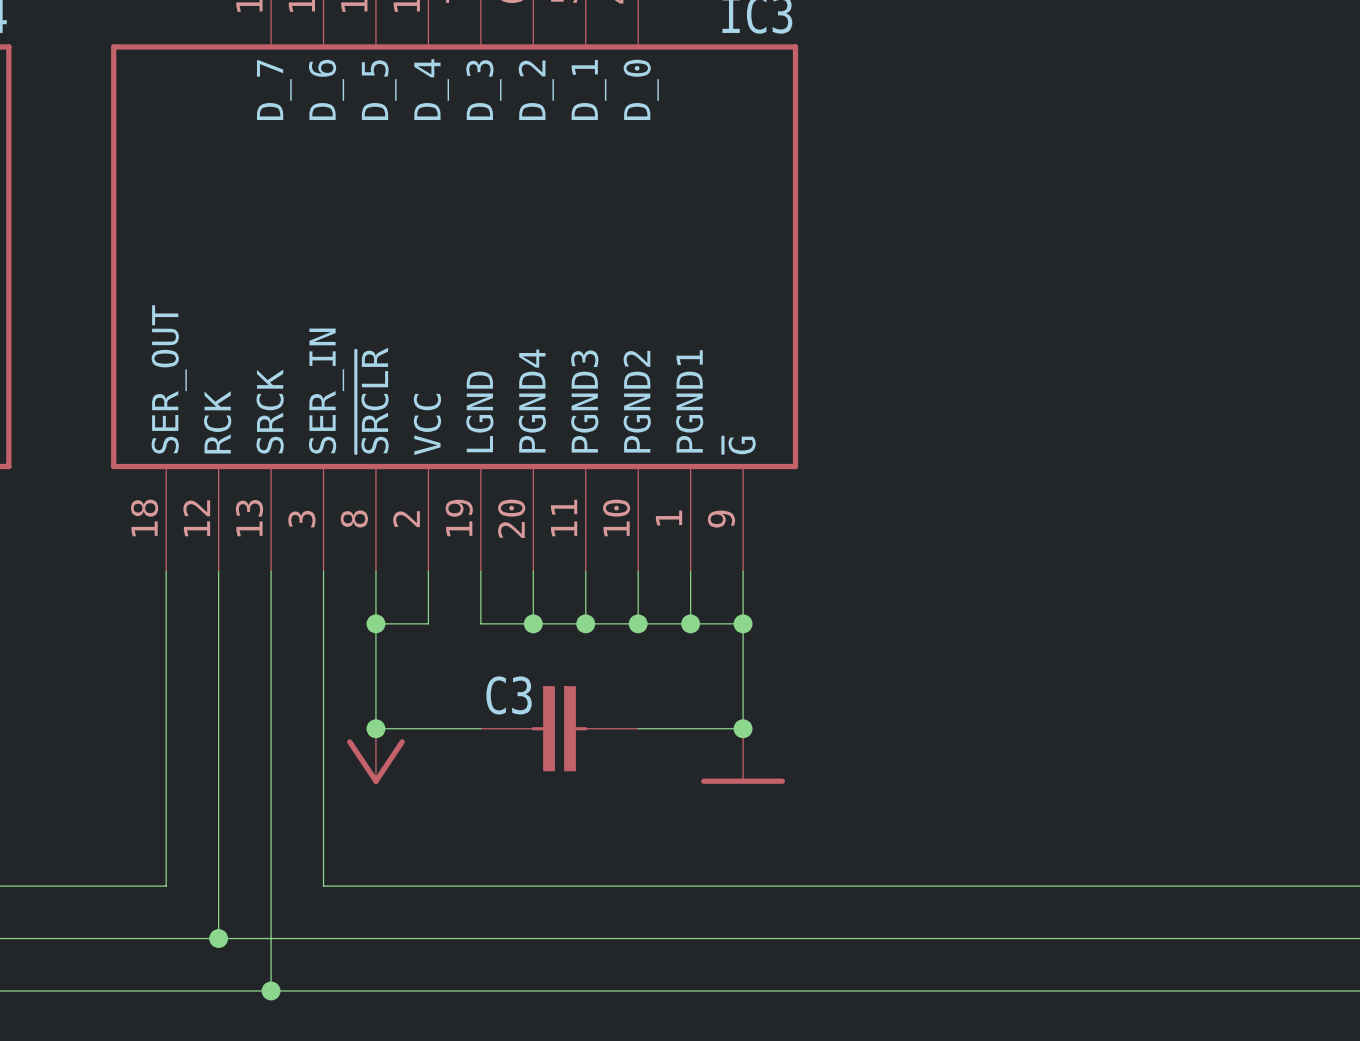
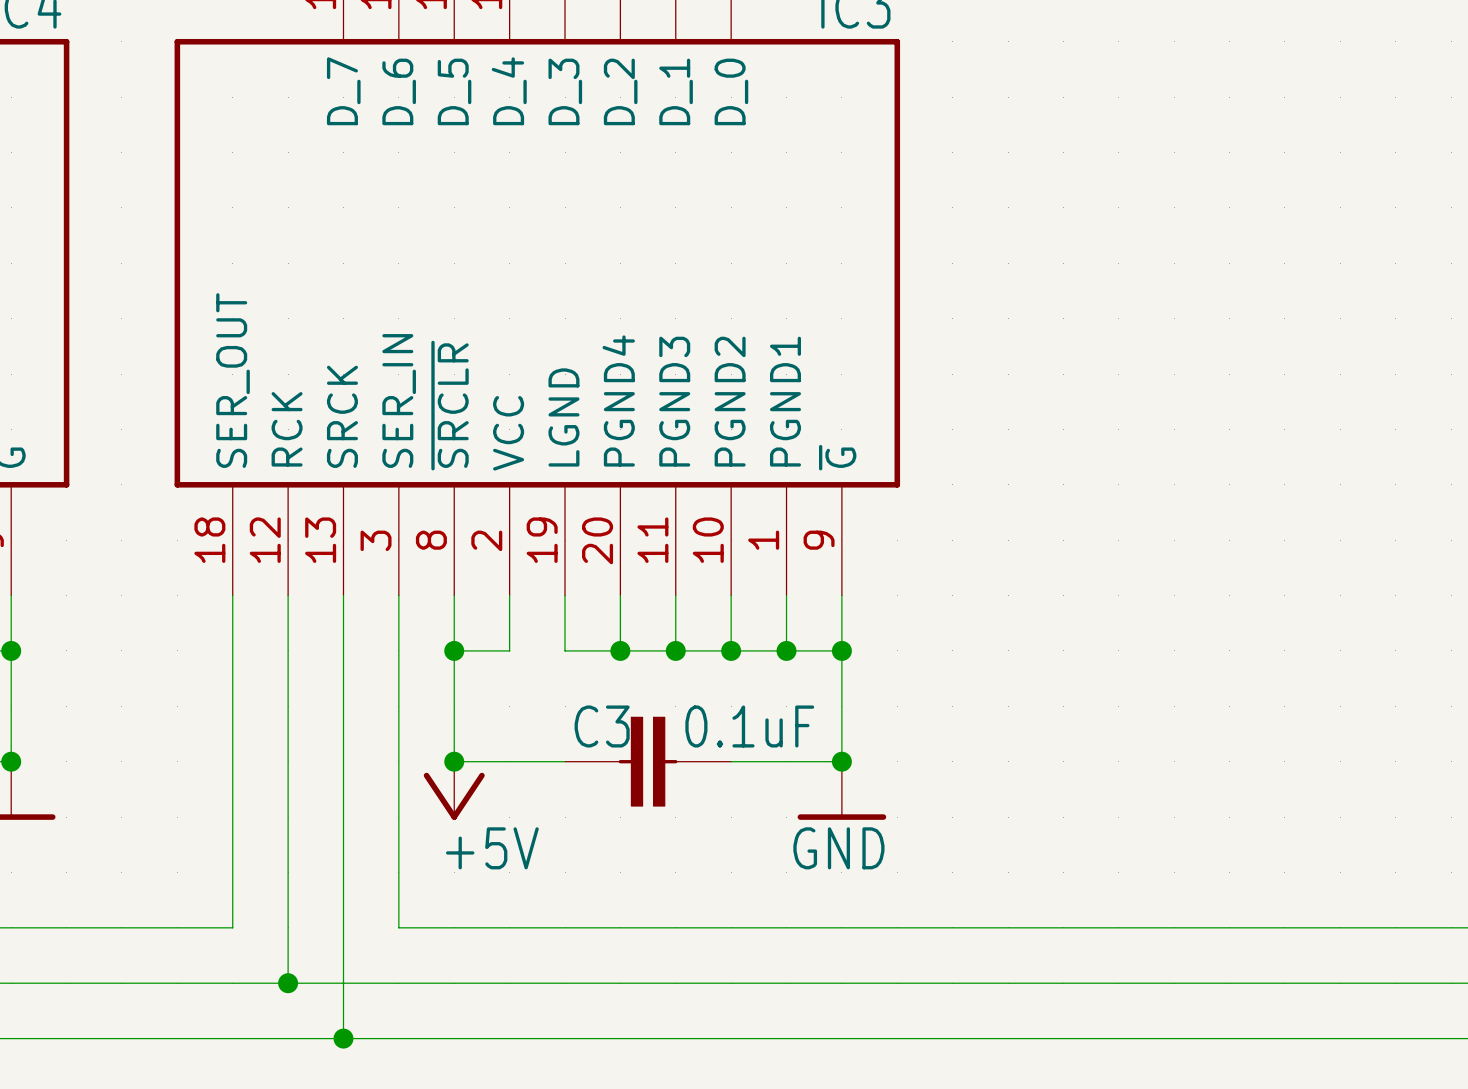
C3 value: none -> 0.1uF (749, 726)
power symbol text: none -> GND (838, 848)
power symbol text: none -> +5V (492, 848)

